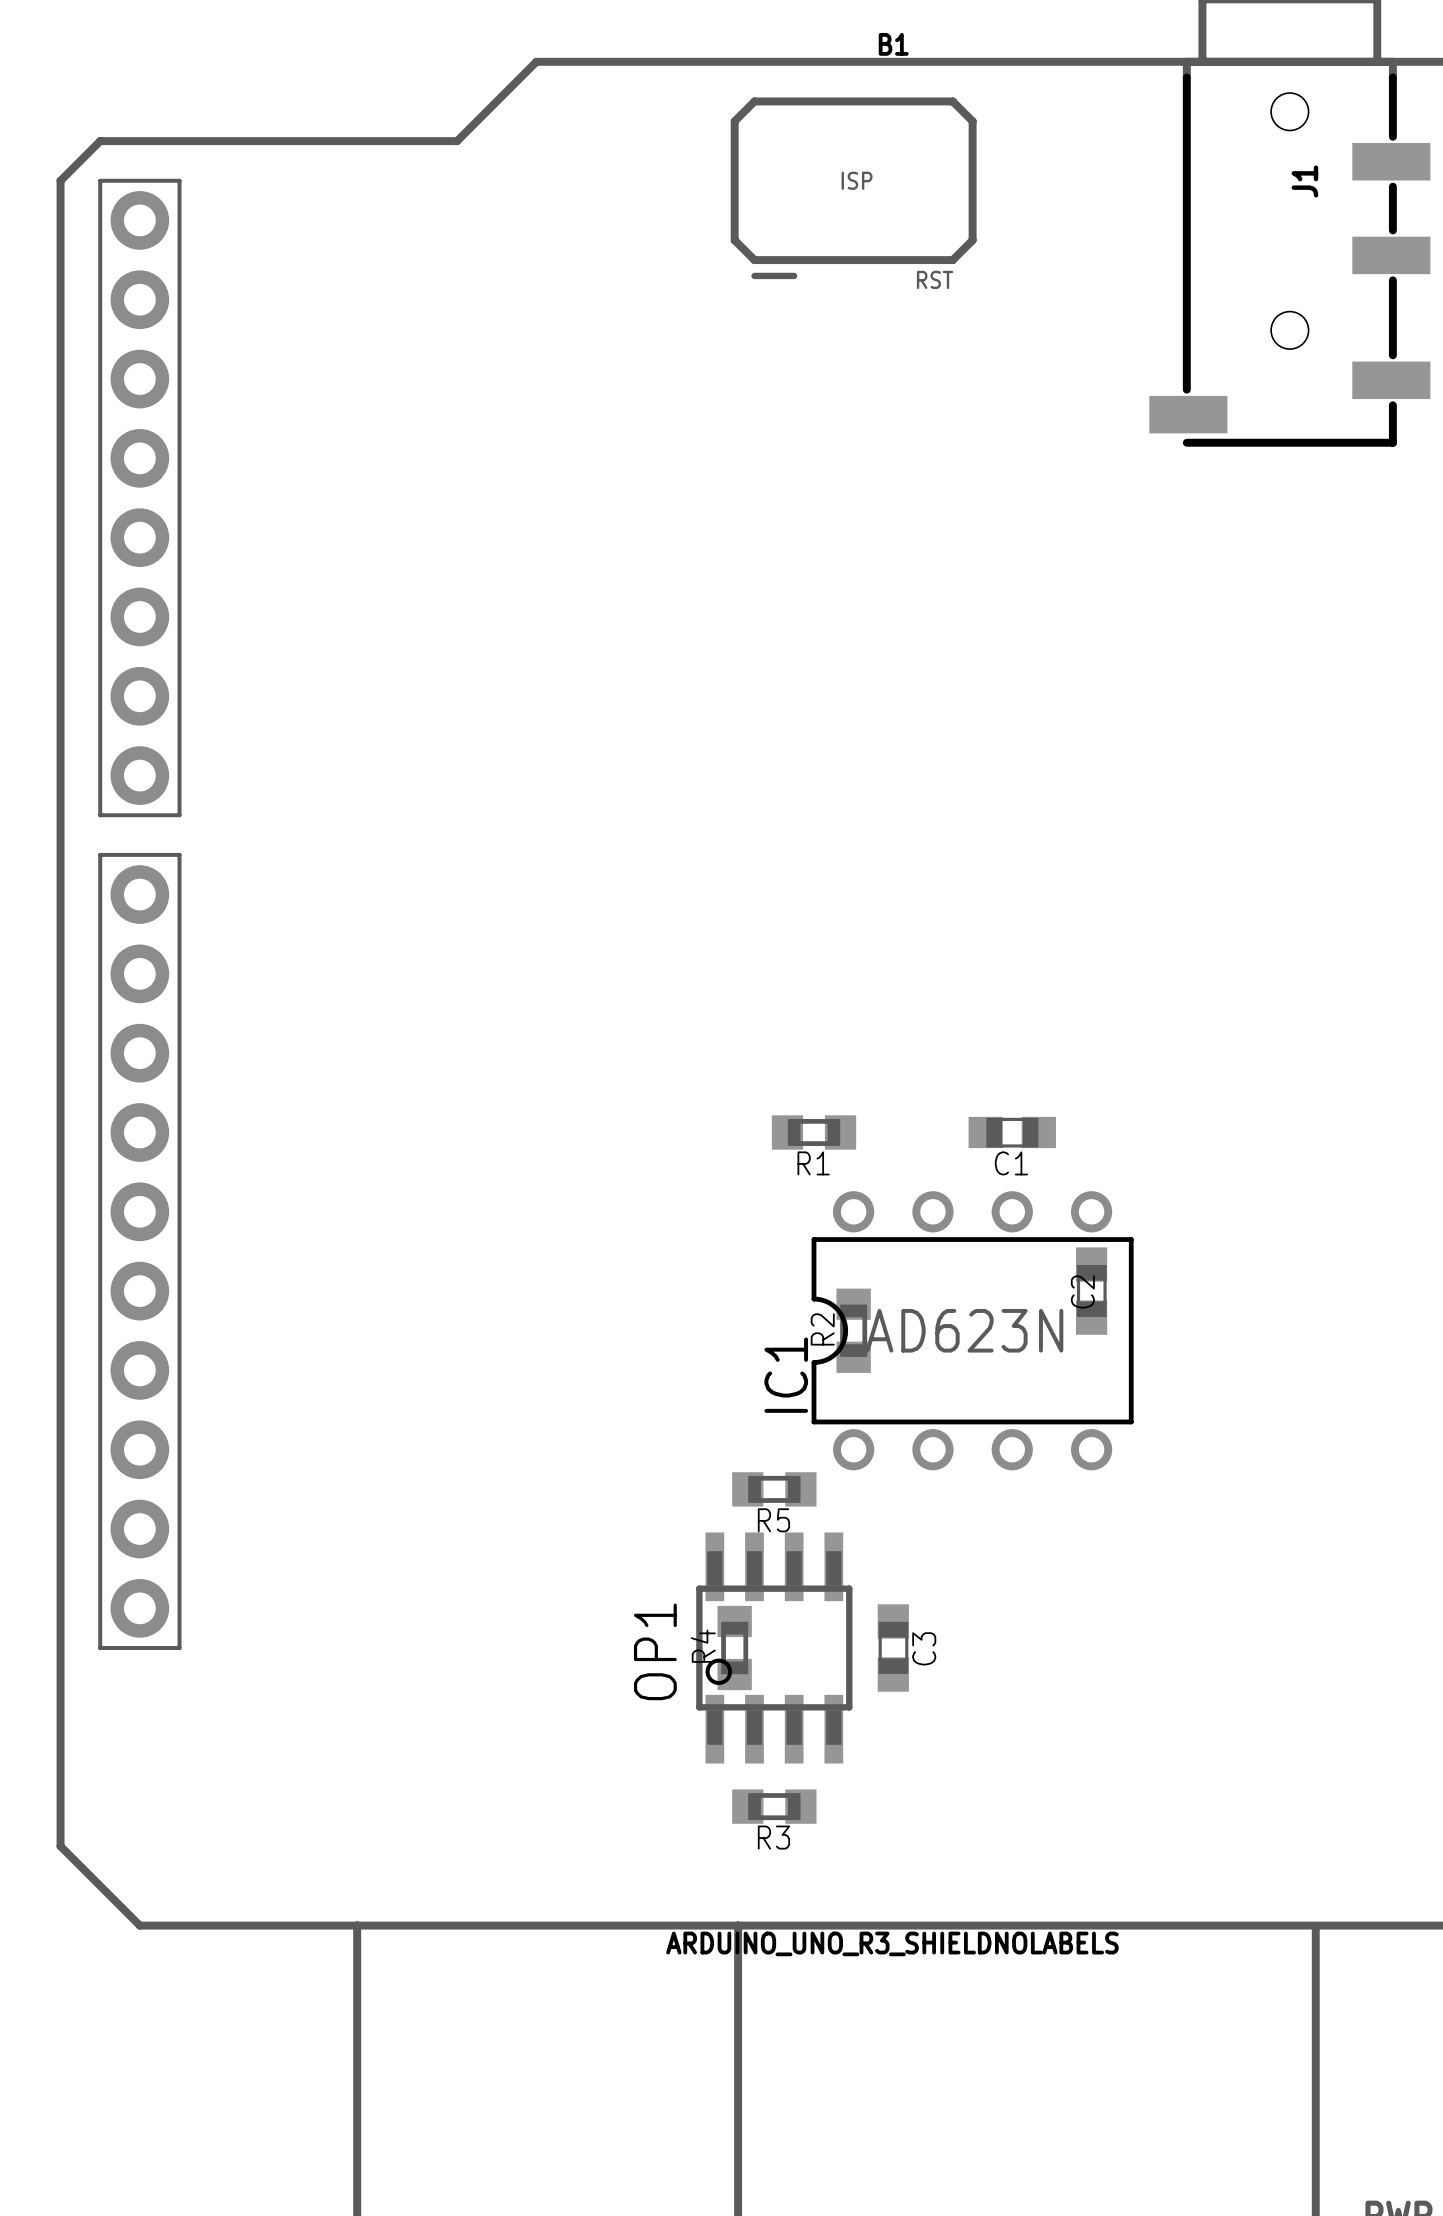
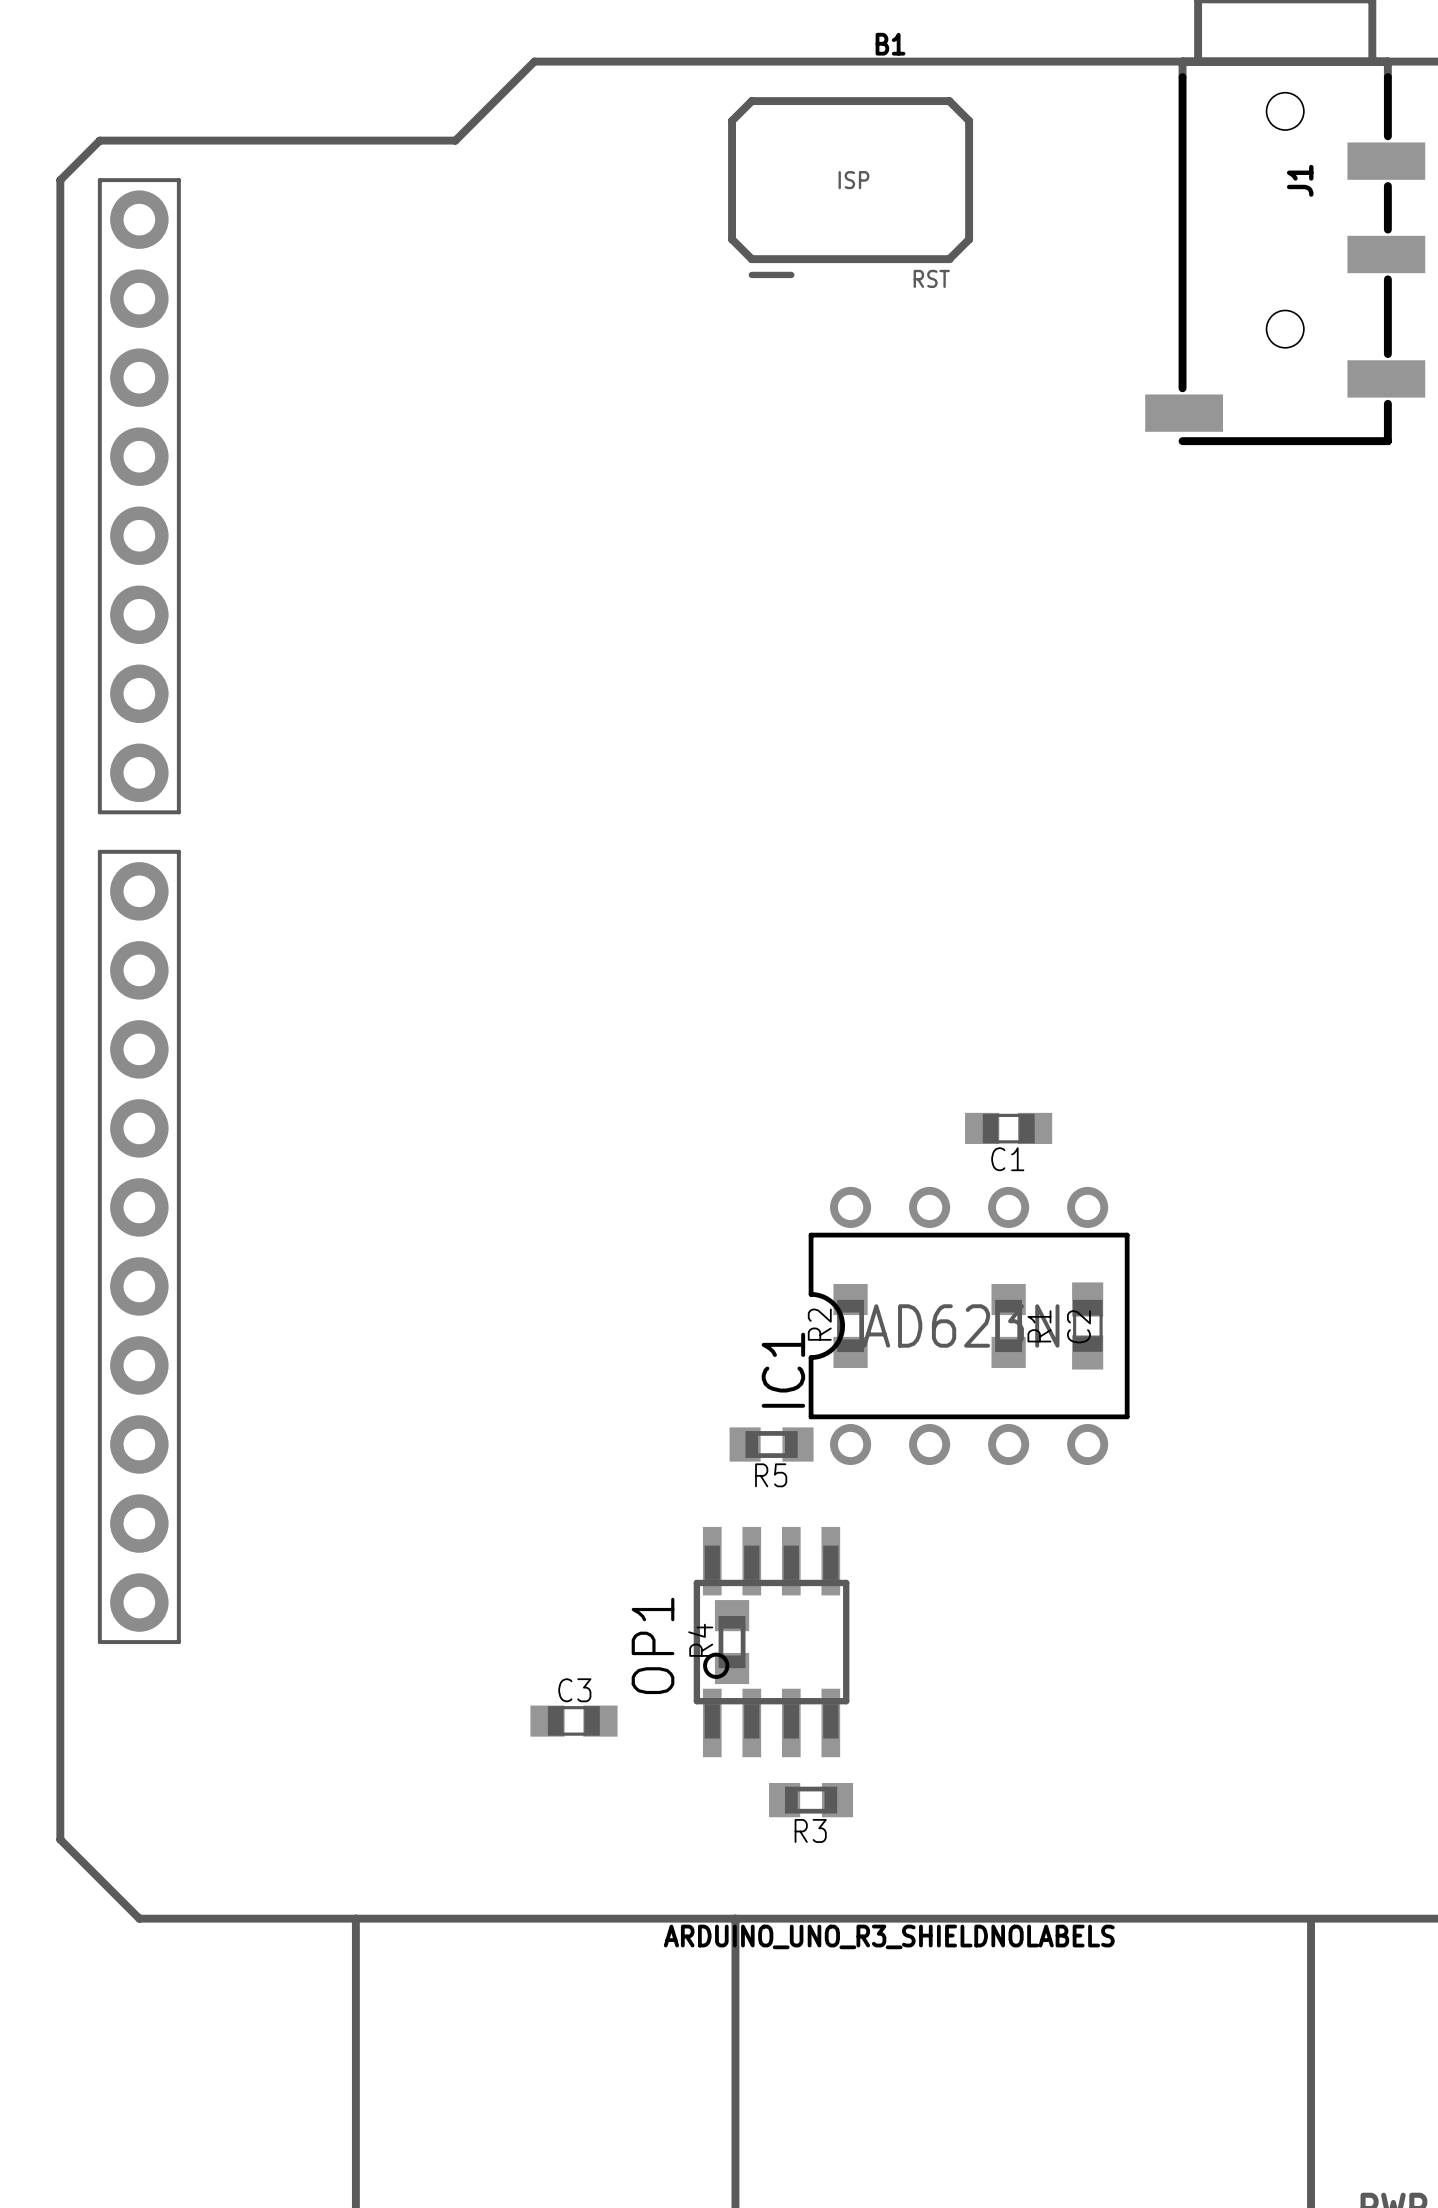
R1 rotation: 0° (813, 1132) -> 90° clockwise (1008, 1325)
R1 position: (813, 1132) -> (1008, 1325)
C2 position: (1091, 1291) -> (1087, 1325)
R5 position: (774, 1489) -> (771, 1444)
C3 rotation: 0° (893, 1648) -> 90° clockwise (573, 1721)
C3 position: (893, 1648) -> (573, 1721)
R3 position: (774, 1806) -> (811, 1800)

